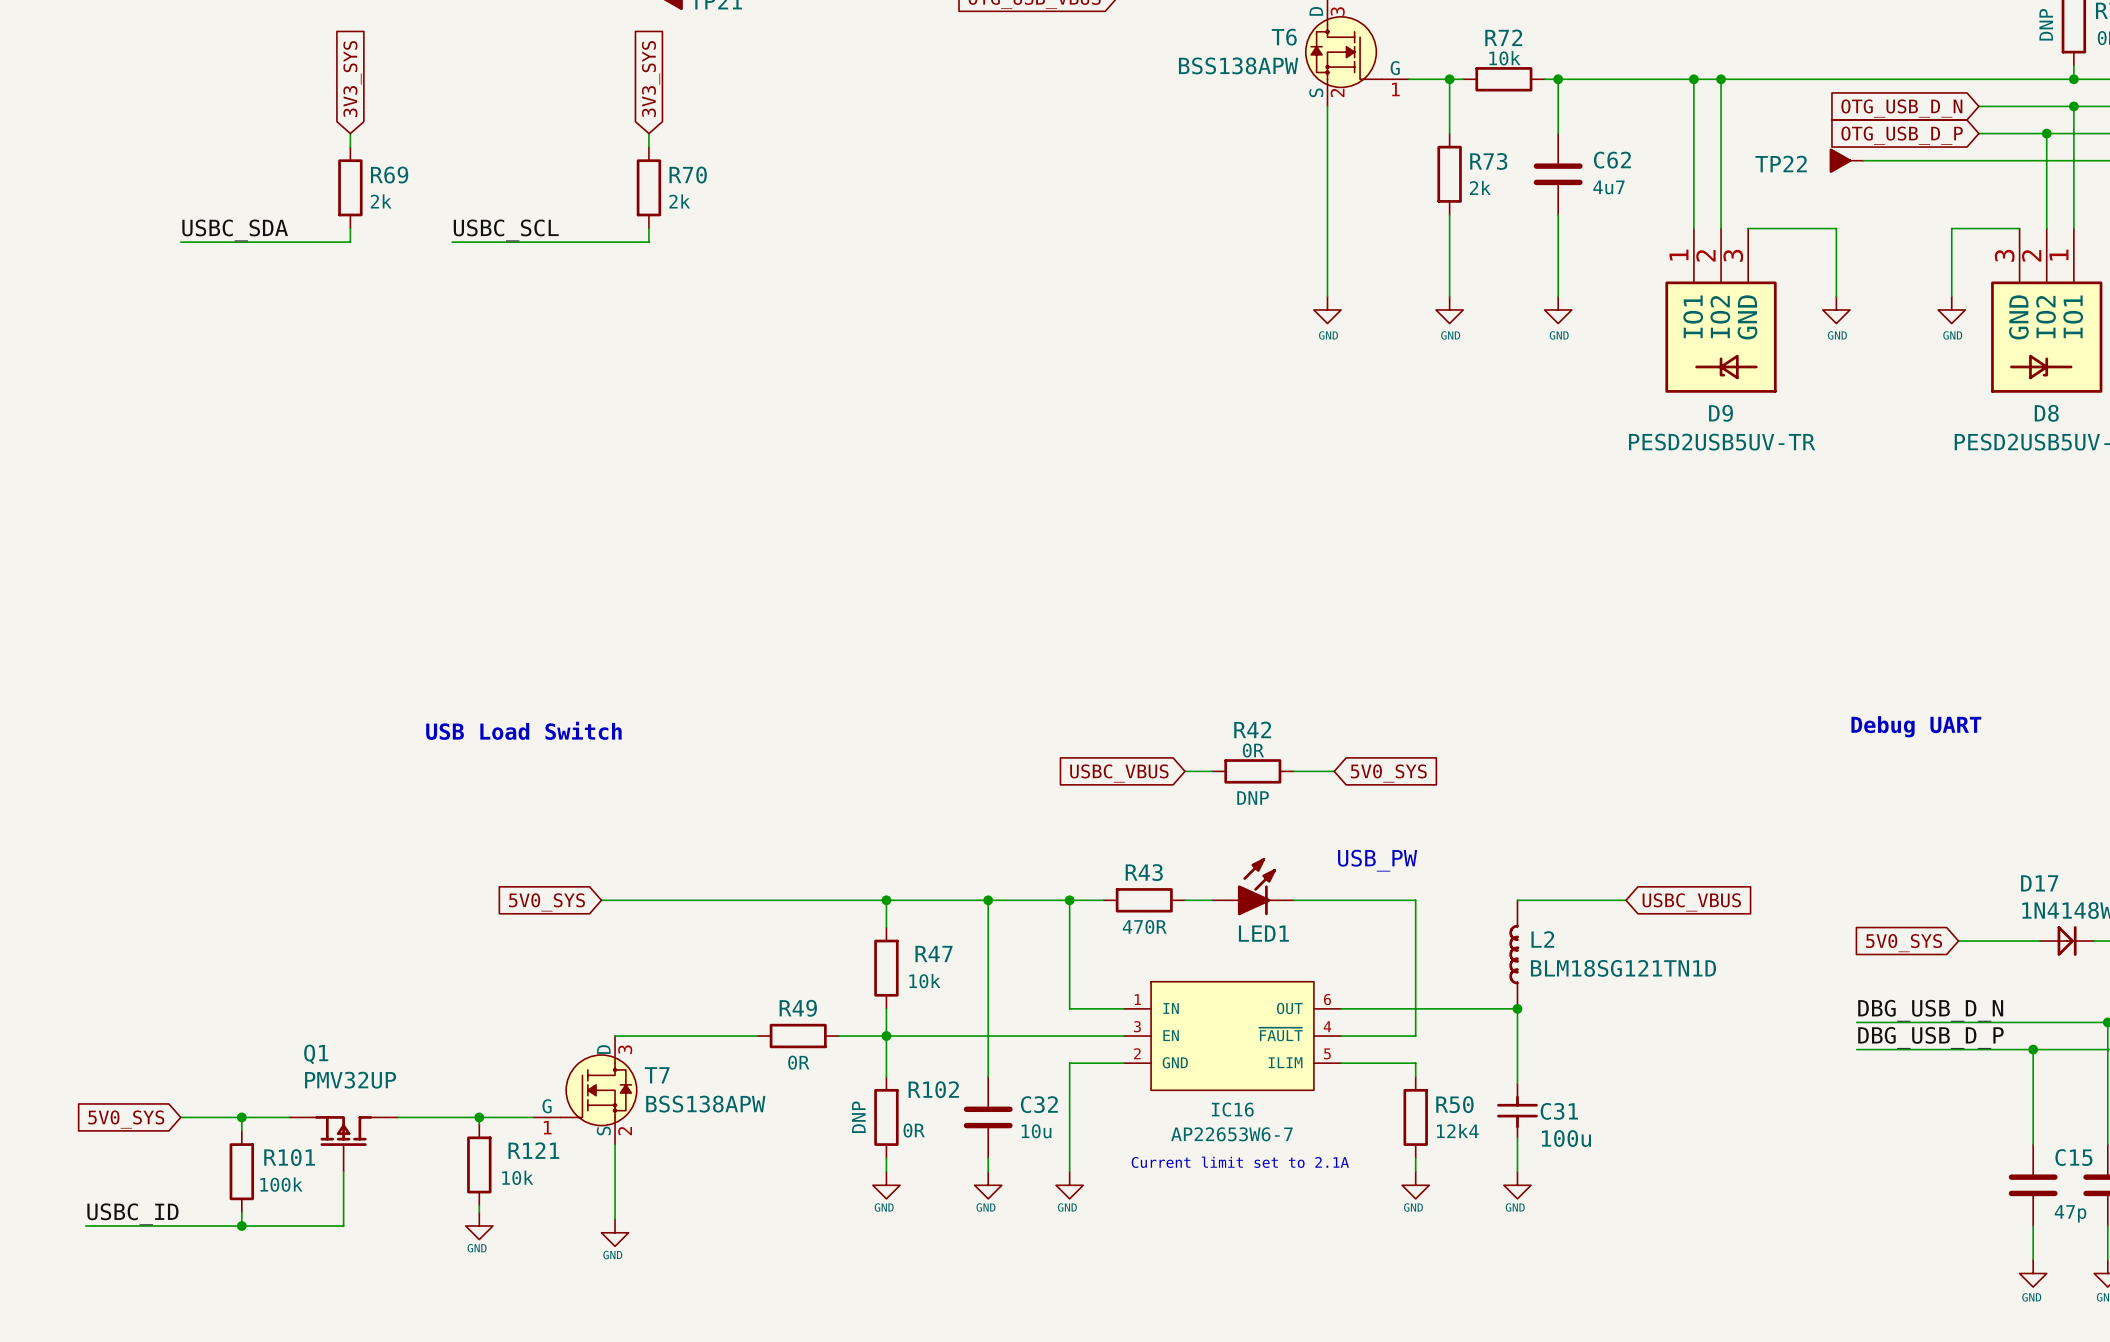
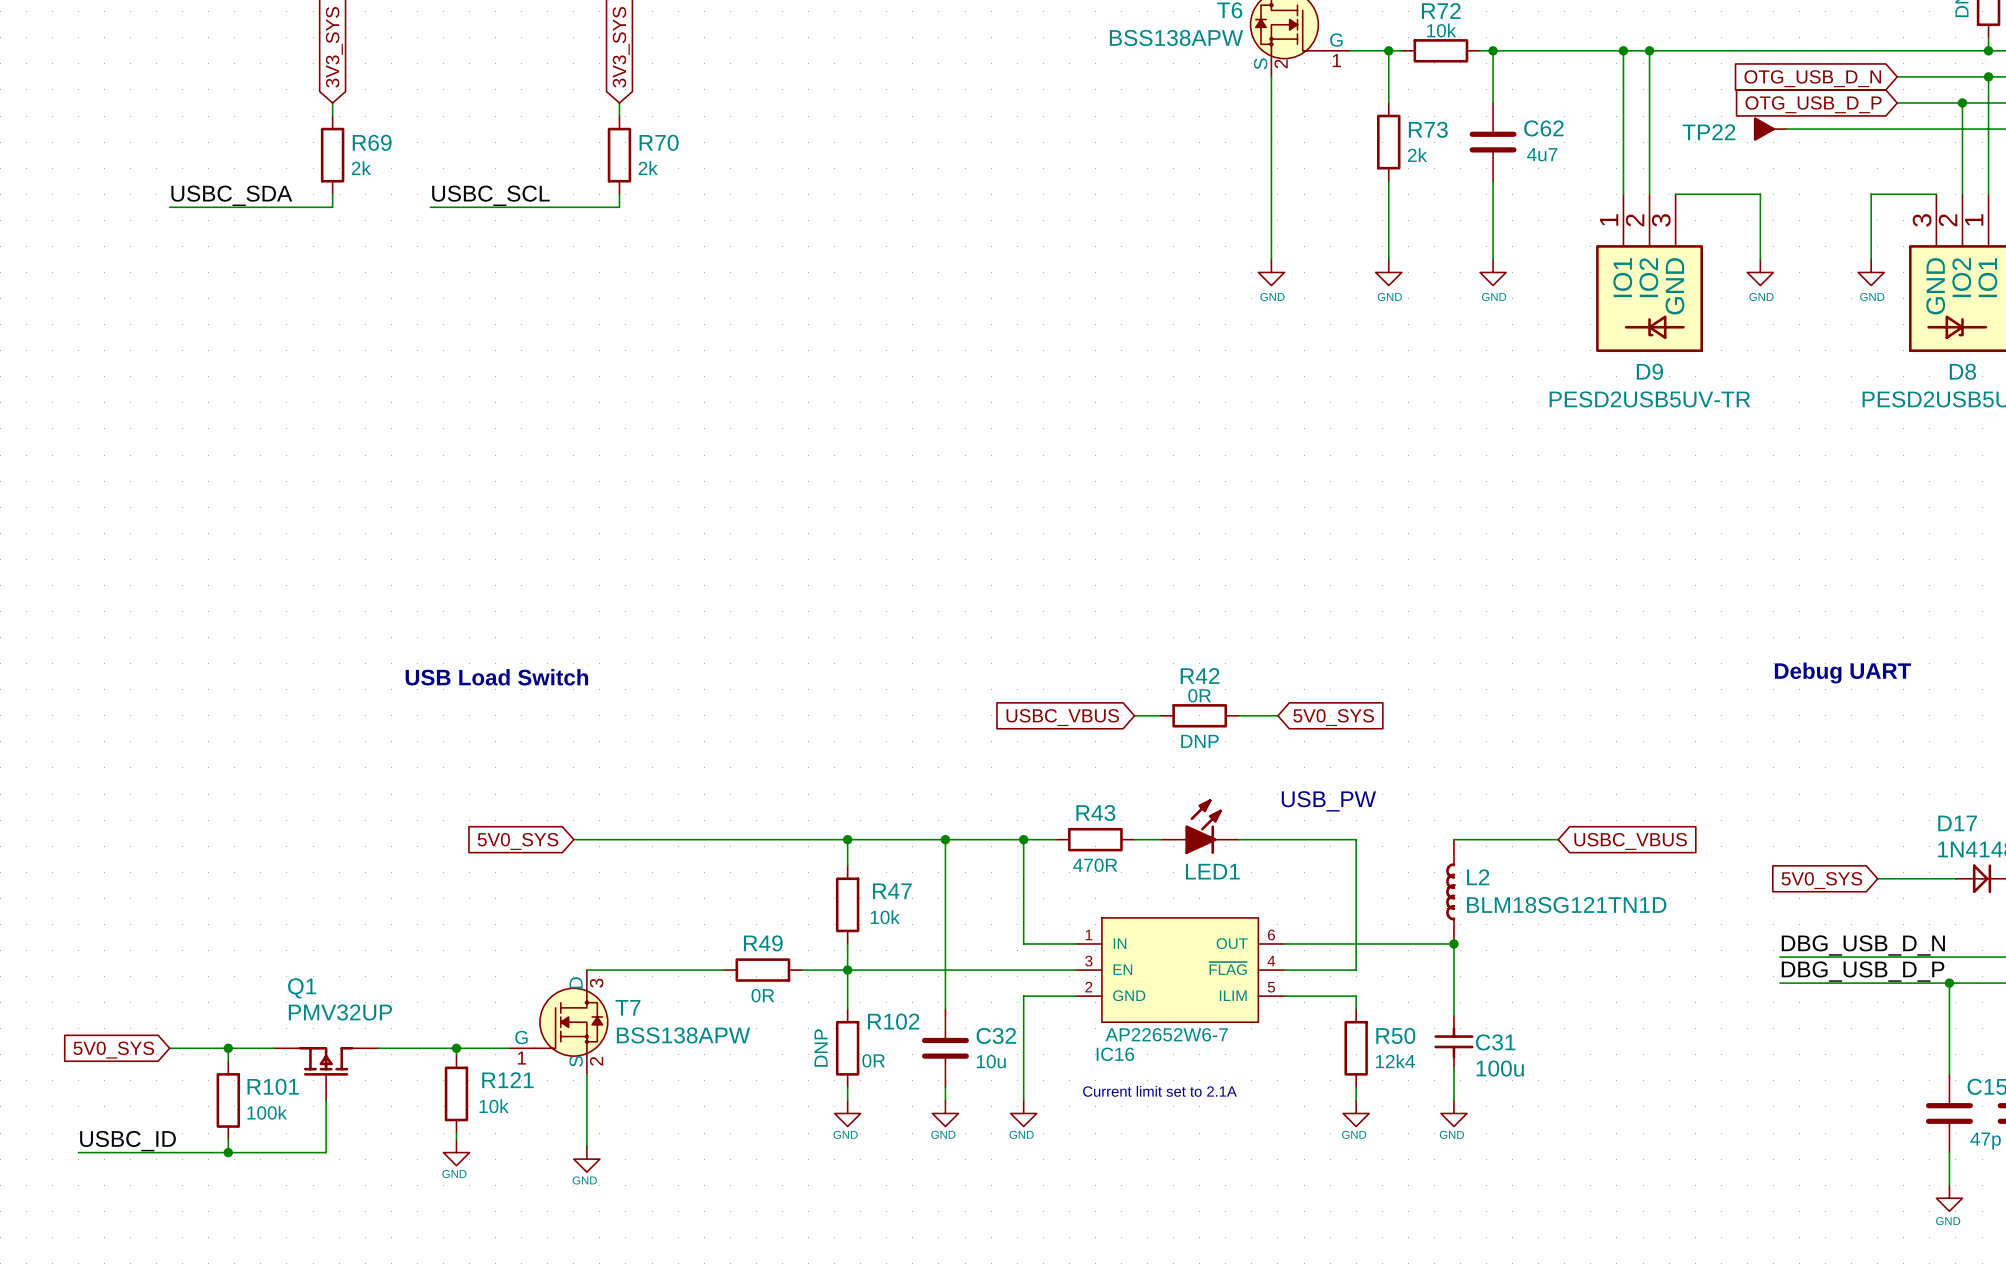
IC16 pin name: ~{FAULT} (1281, 1034) -> ~{FLAG} (1228, 968)
IC16 name position: IC16 (1232, 1109) -> IC16 (1115, 1054)
IC16 value: AP22653W6-7 (1231, 1134) -> AP22652W6-7 (1166, 1034)

